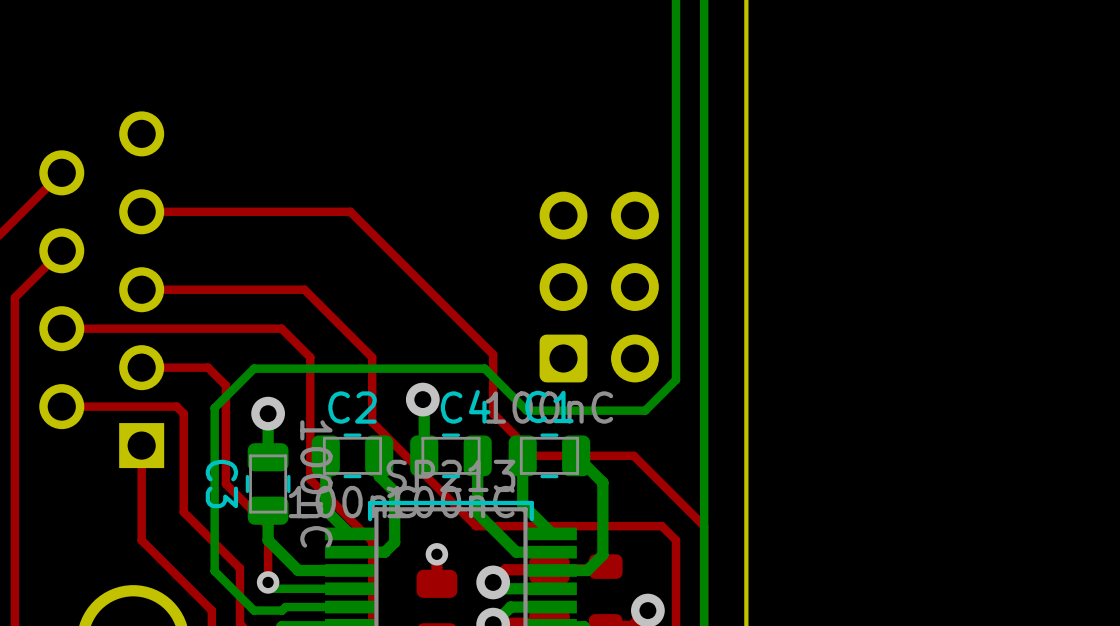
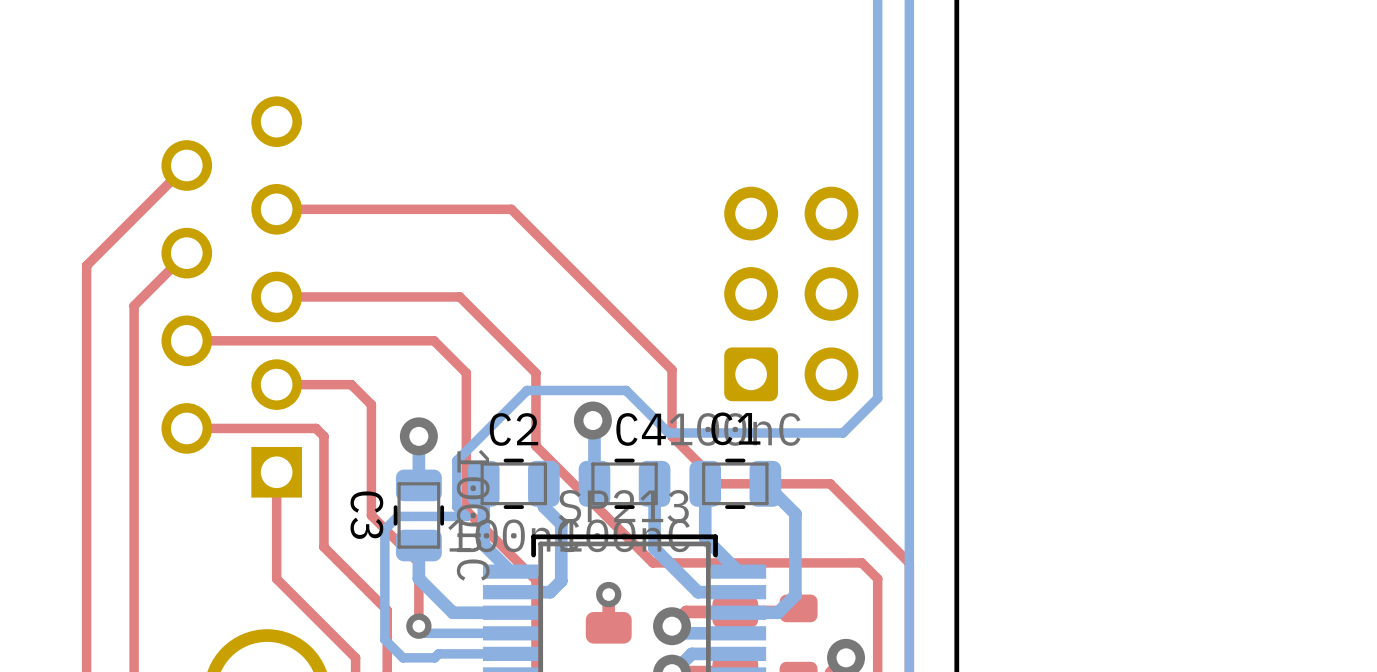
bottom track: (526, 410) (484, 368) (254, 368) (214, 408) (214, 571) (237, 594) -> (709, 432) (668, 432) (626, 390) (527, 390) (456, 460) (456, 506) (466, 516) (397, 516) (384, 529) (384, 639)

